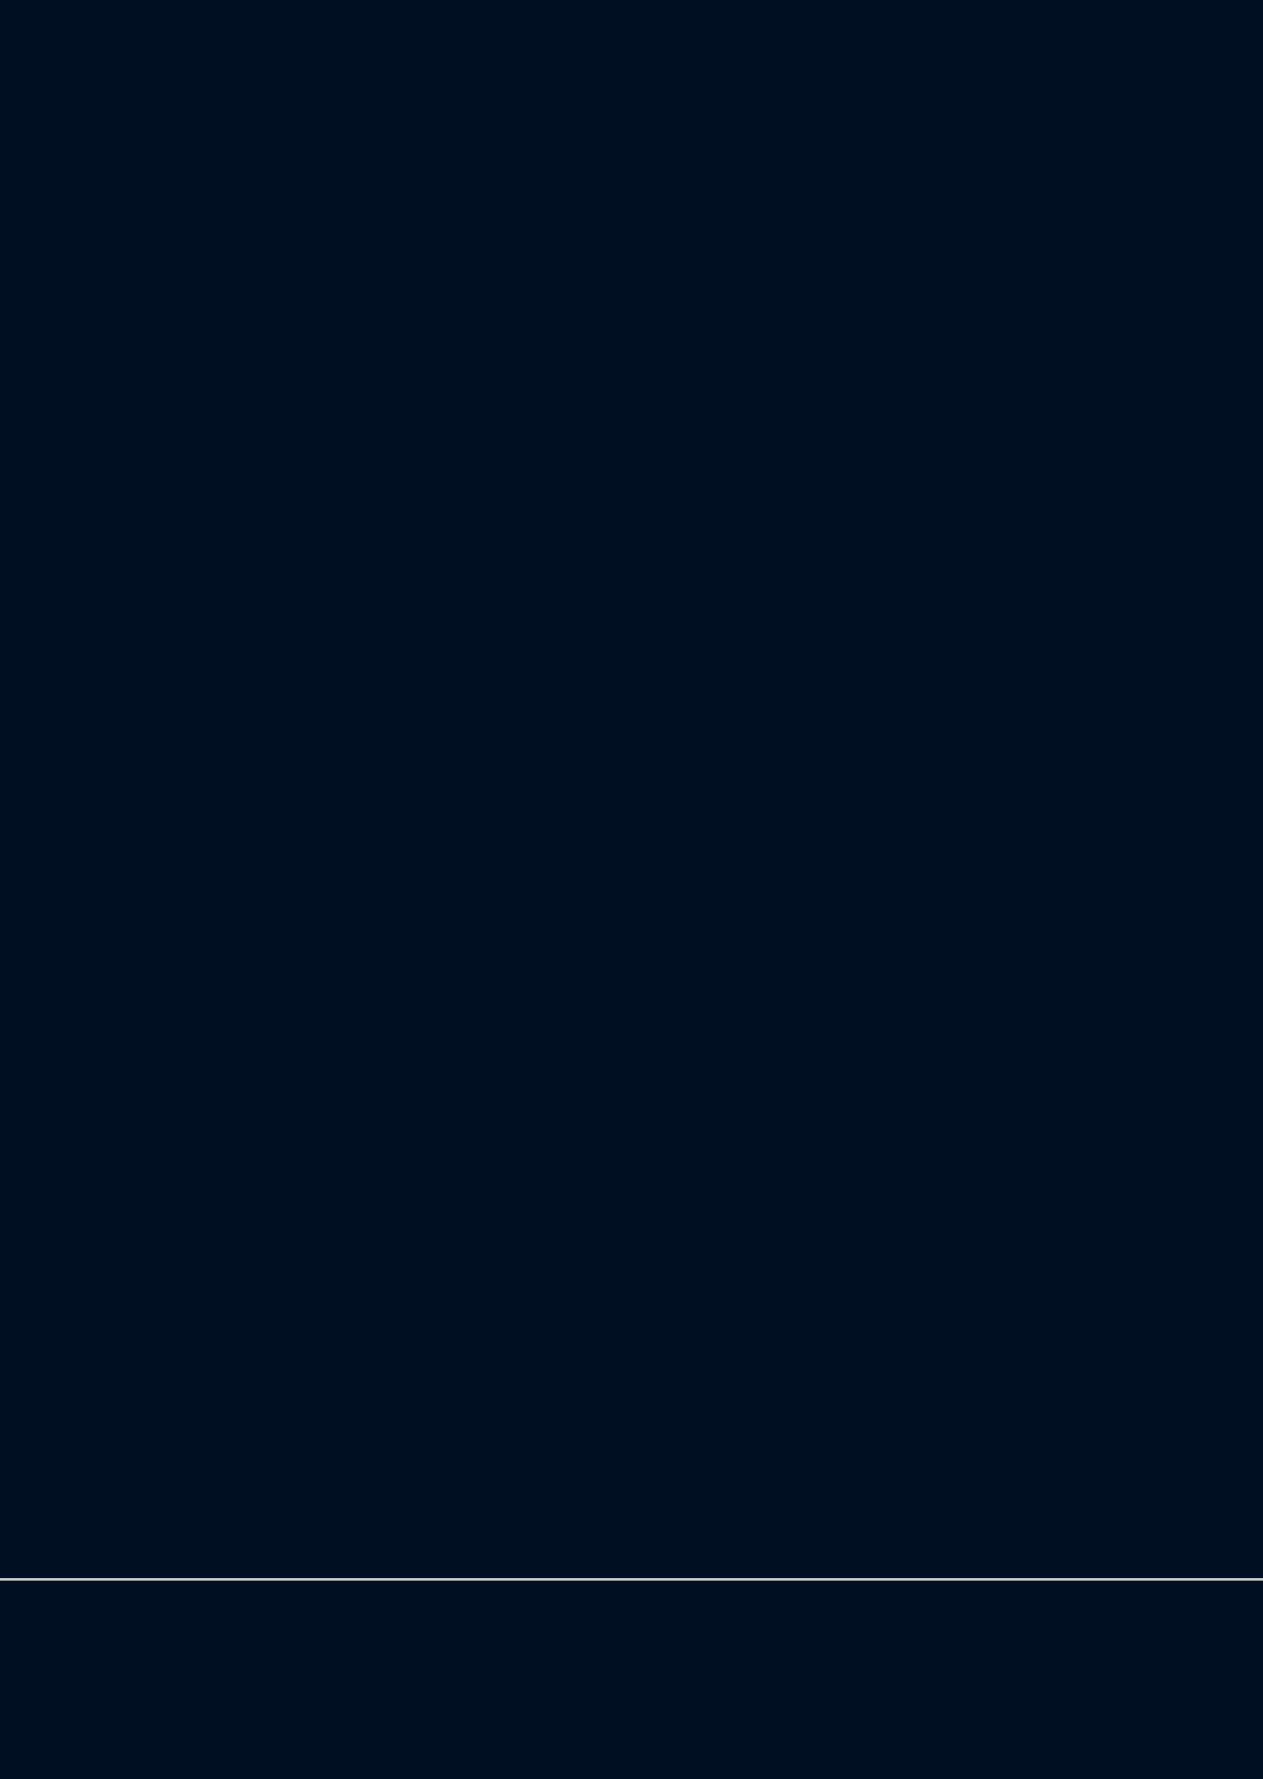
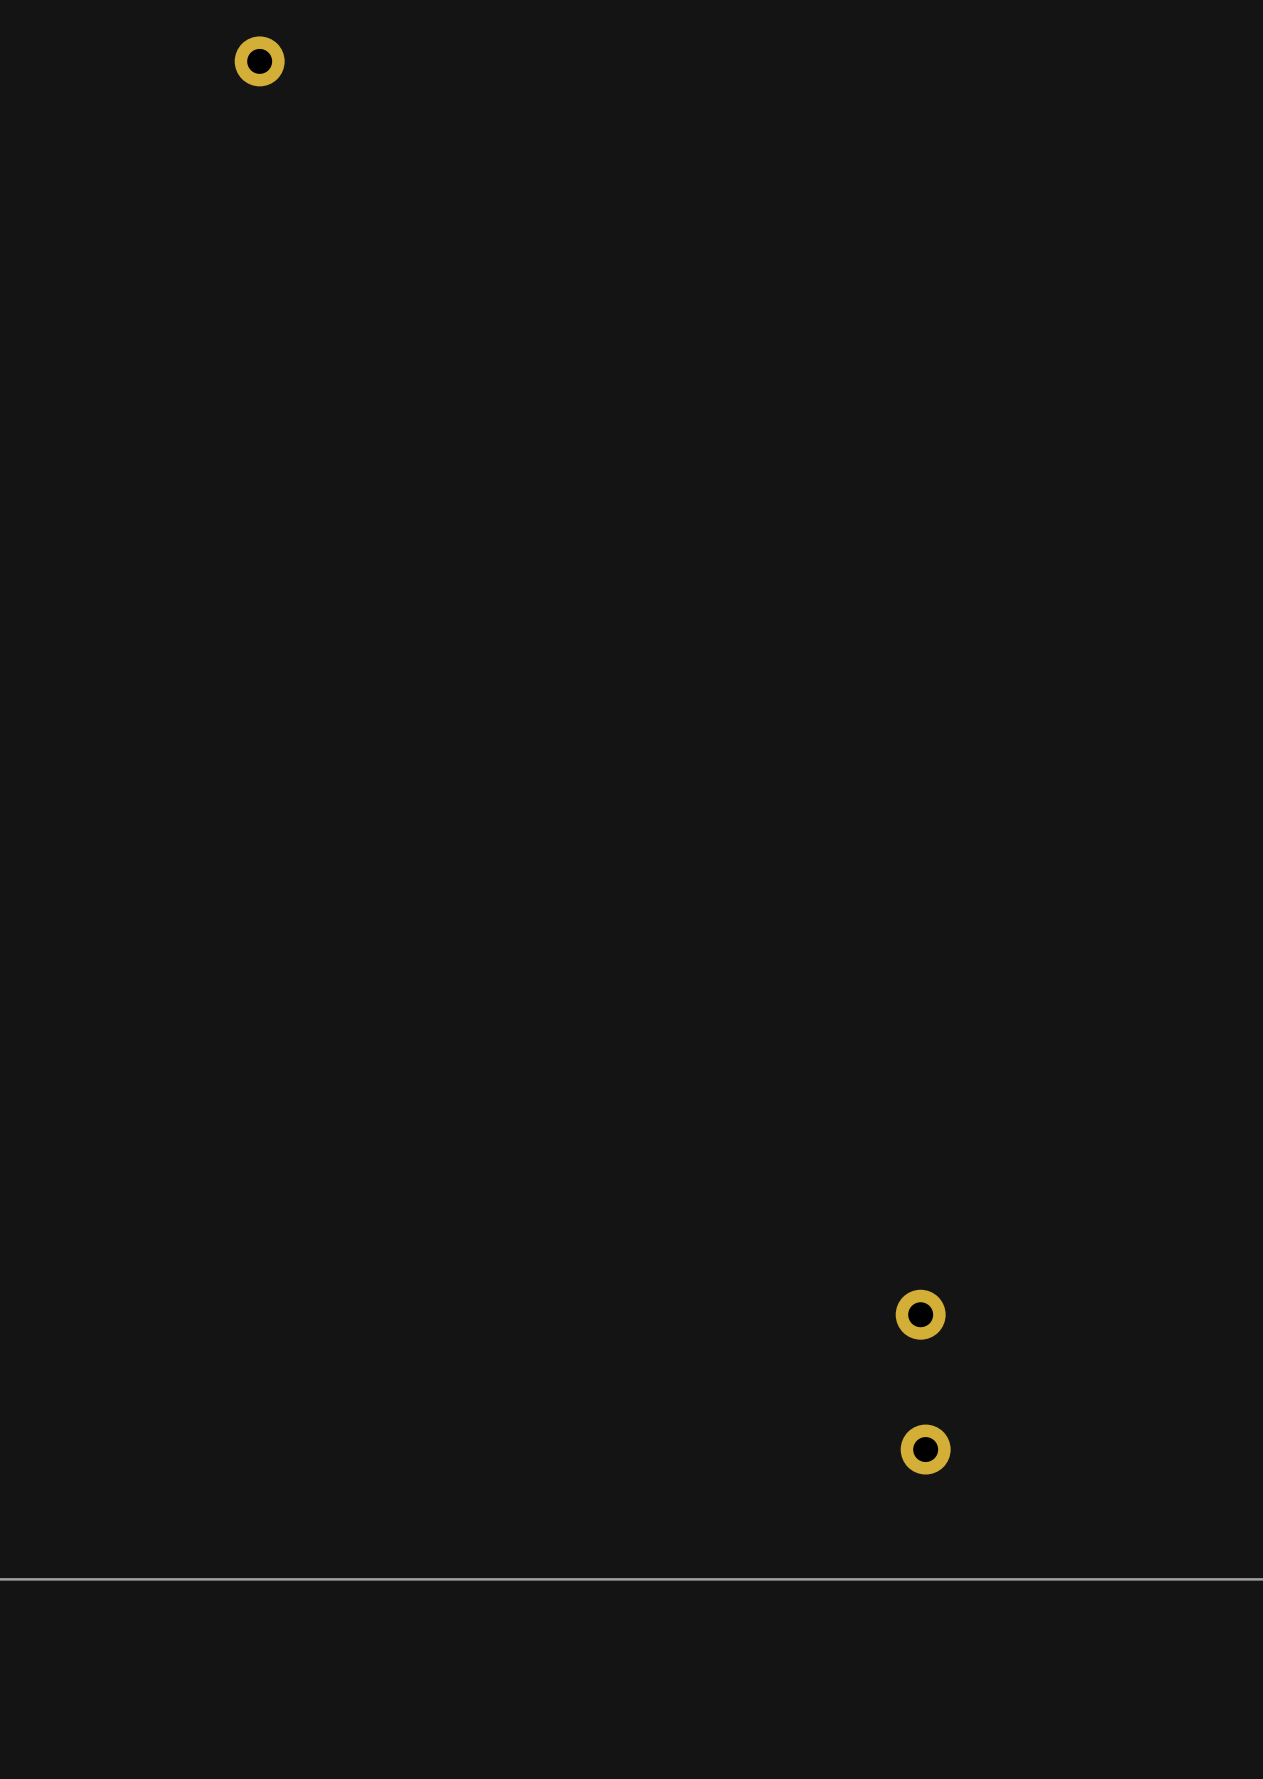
part: none -> (259, 61)
part: none -> (920, 1314)
part: none -> (925, 1449)

